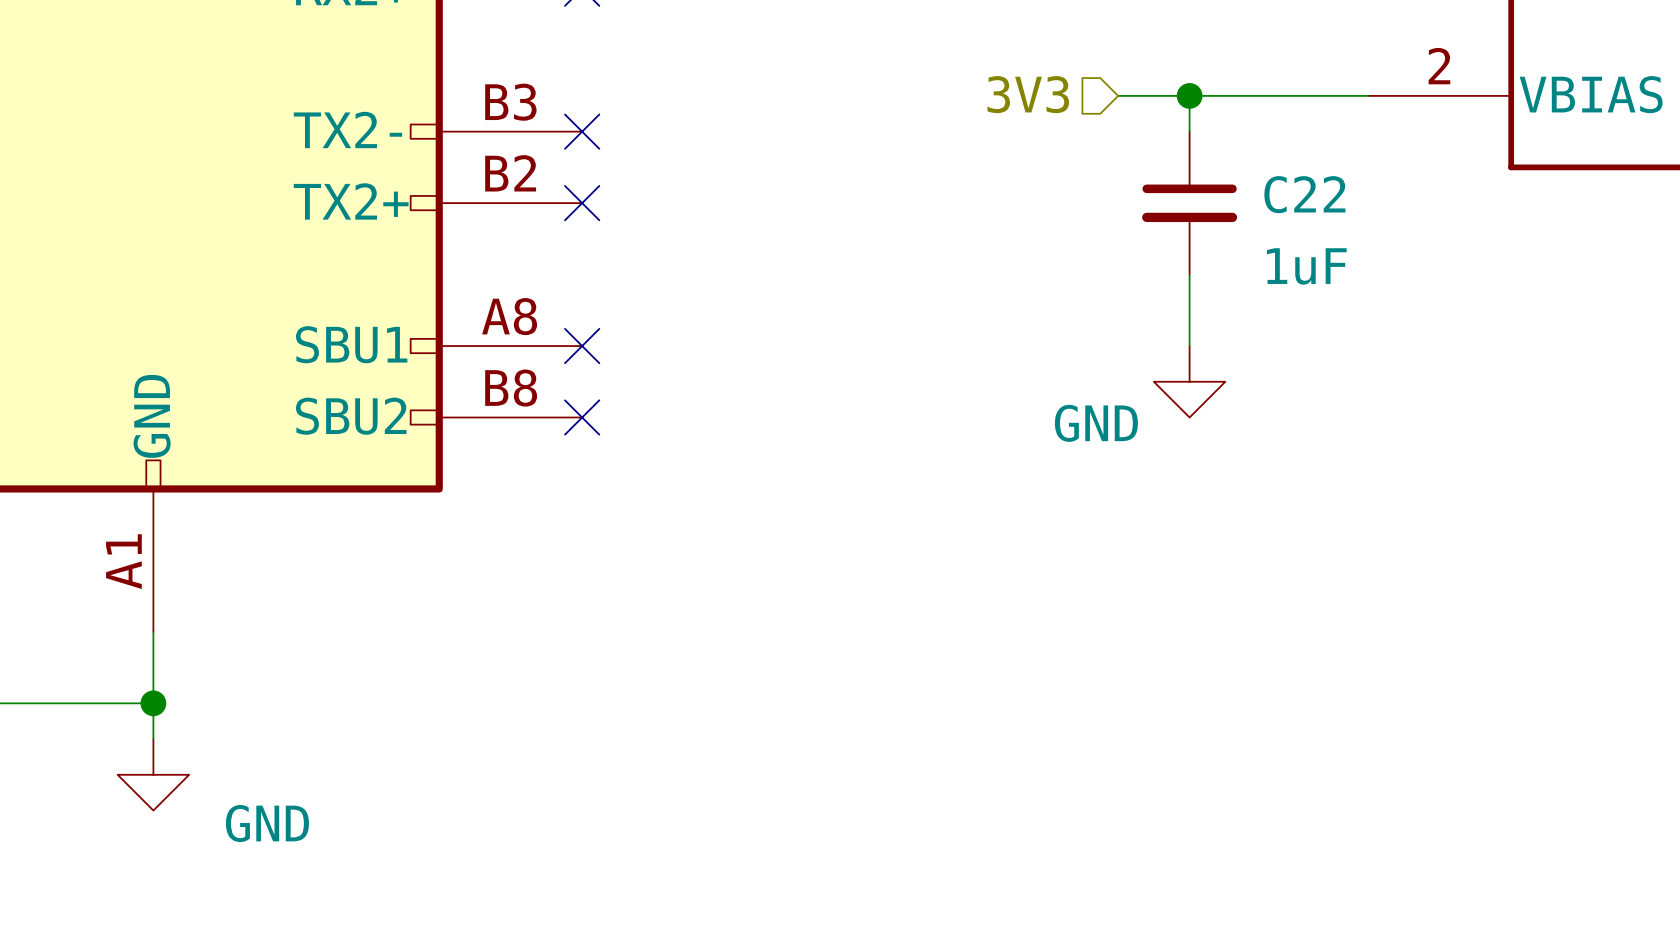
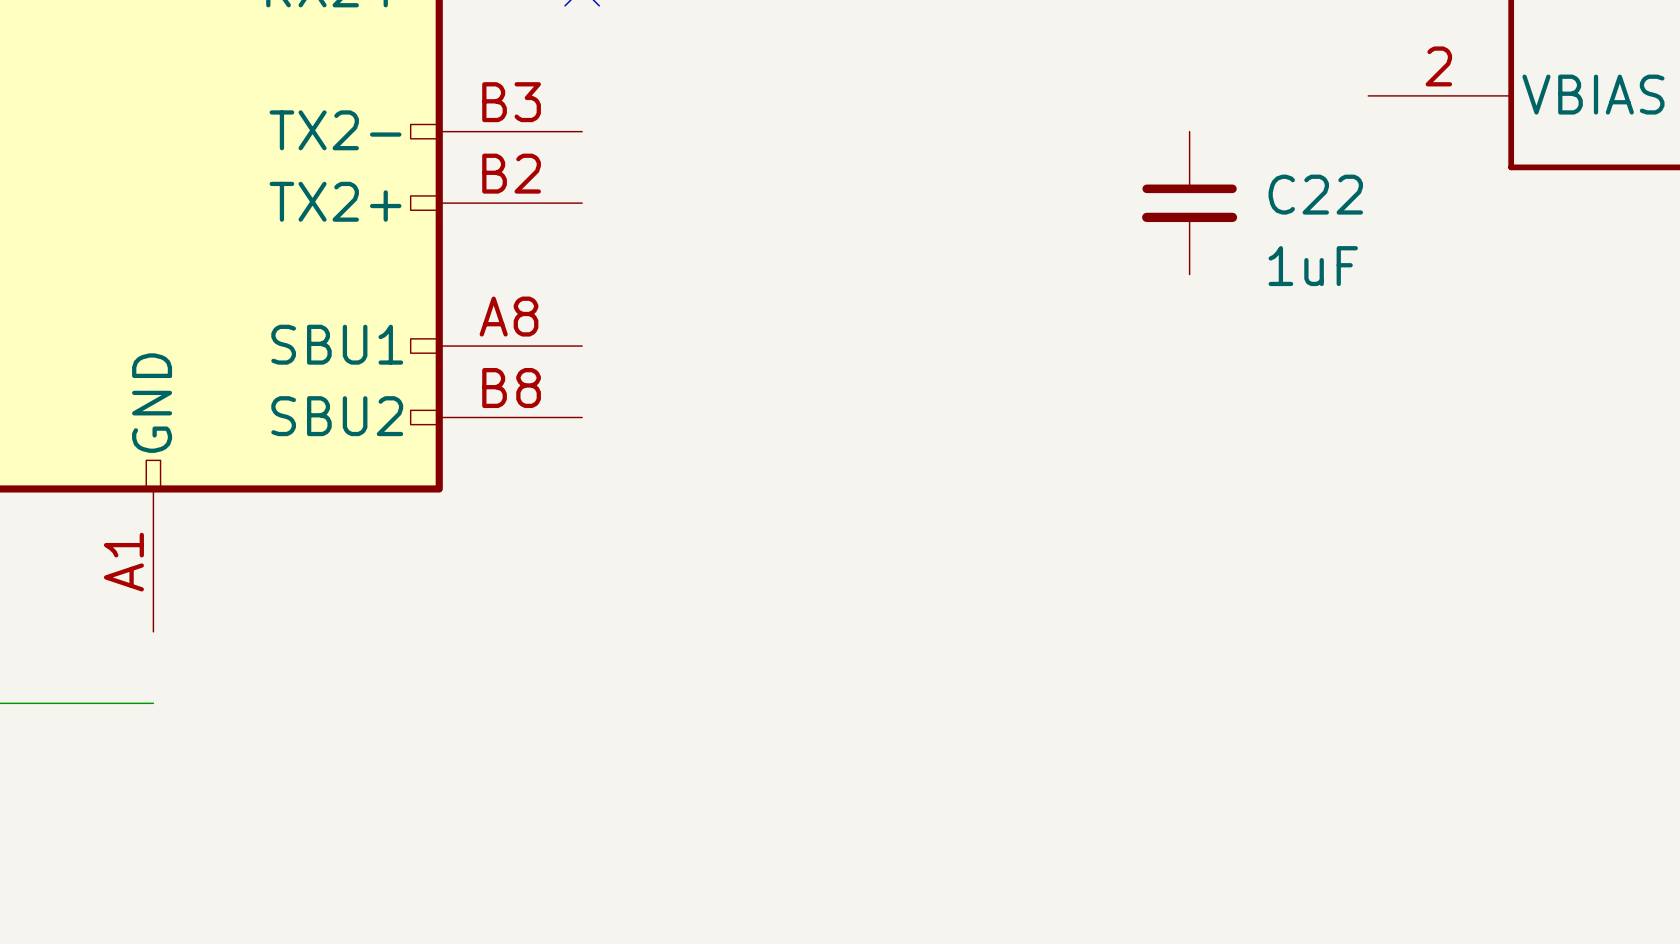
hierarchical label: 3V3 (1028, 94) -> none
wire: (1118, 95) (1368, 95) -> none
wire: (1189, 95) (1189, 131) -> none
junction: (1189, 95) -> none
no-connect mark: (582, 131) -> none
no-connect mark: (582, 203) -> none
wire: (1189, 274) (1189, 346) -> none
no-connect mark: (582, 346) -> none
power symbol: GND (1189, 381) -> none
no-connect mark: (582, 417) -> none
wire: (153, 631) (153, 739) -> none
junction: (153, 703) -> none
power symbol: GND (153, 774) -> none

